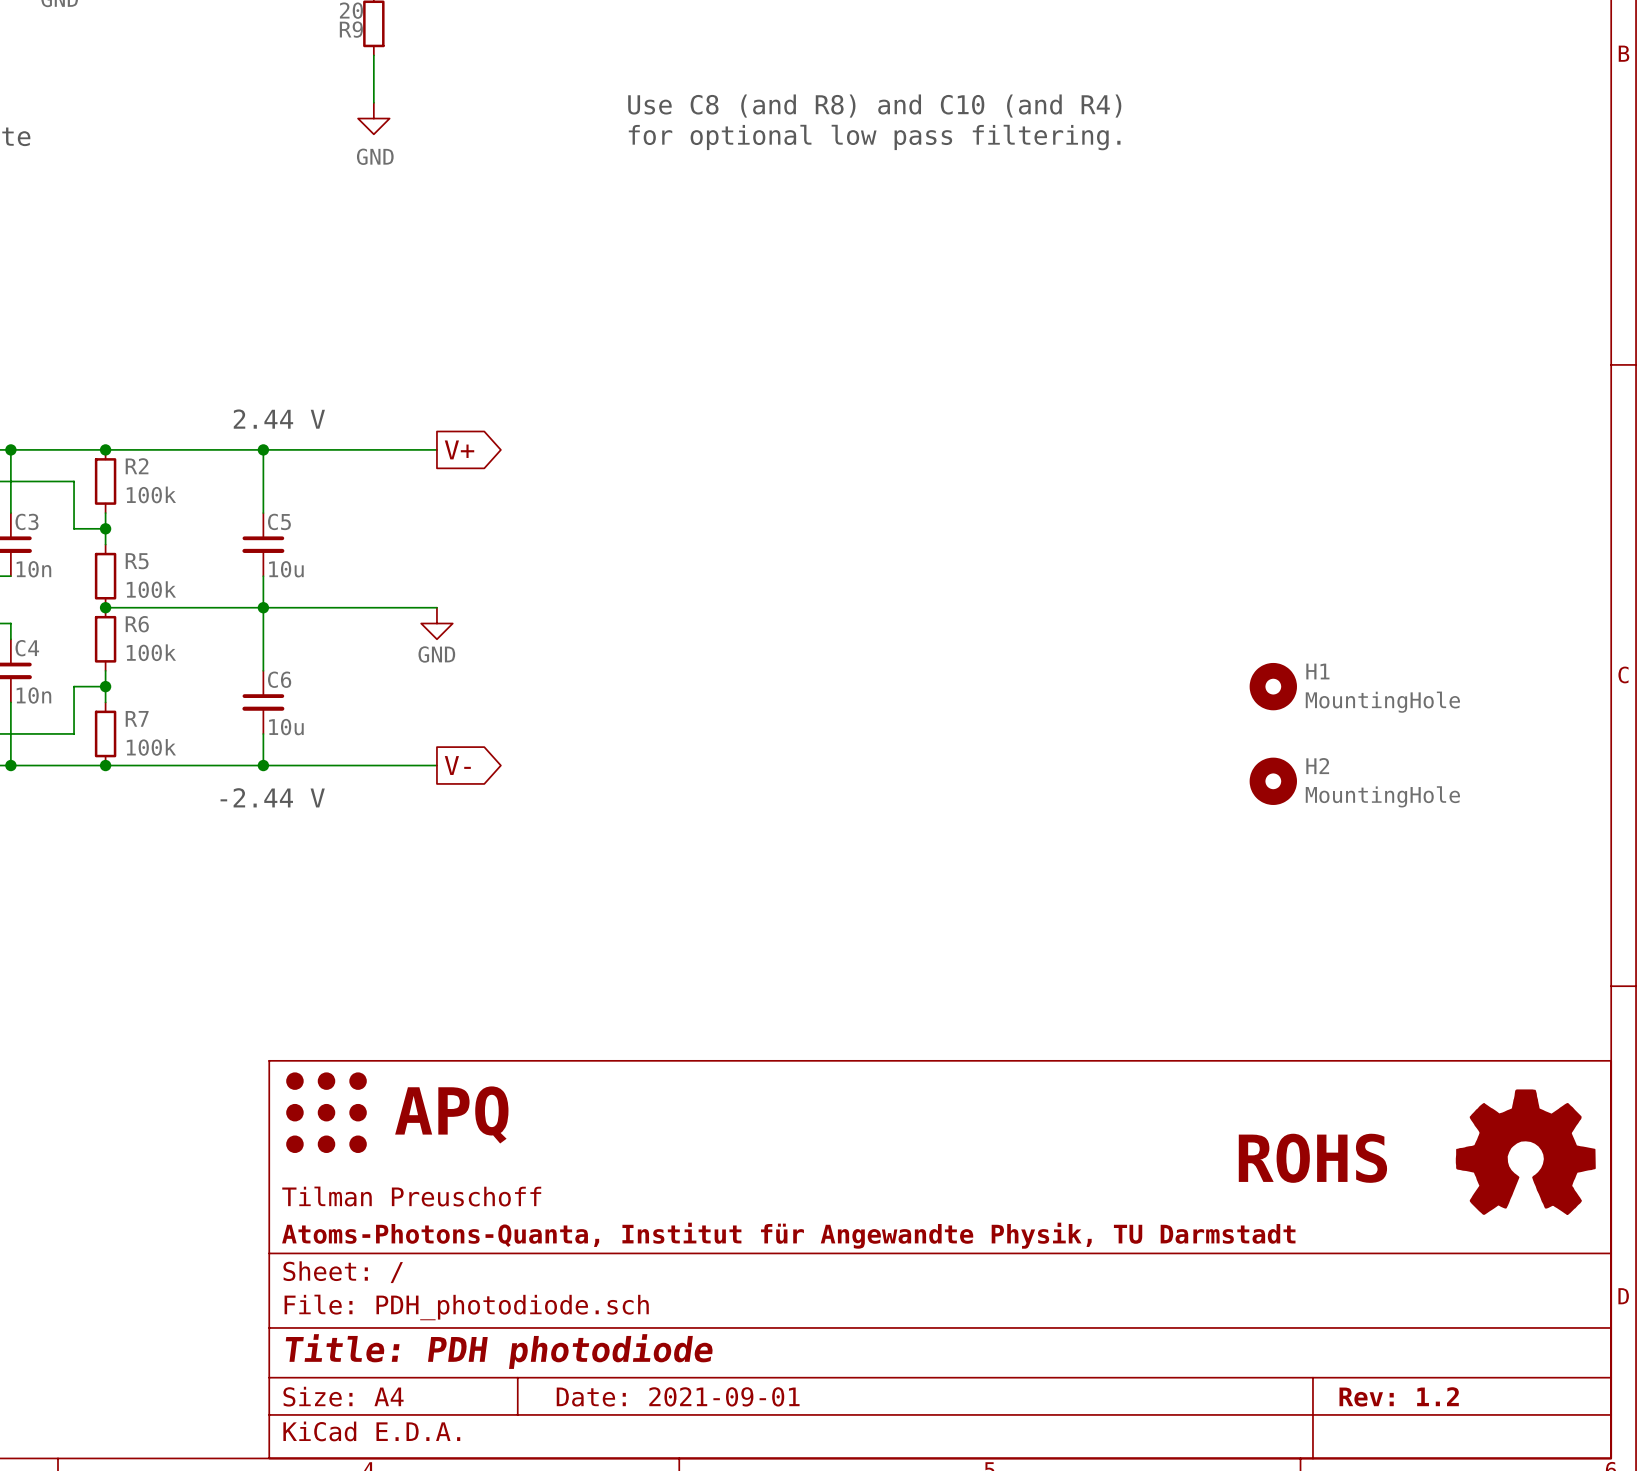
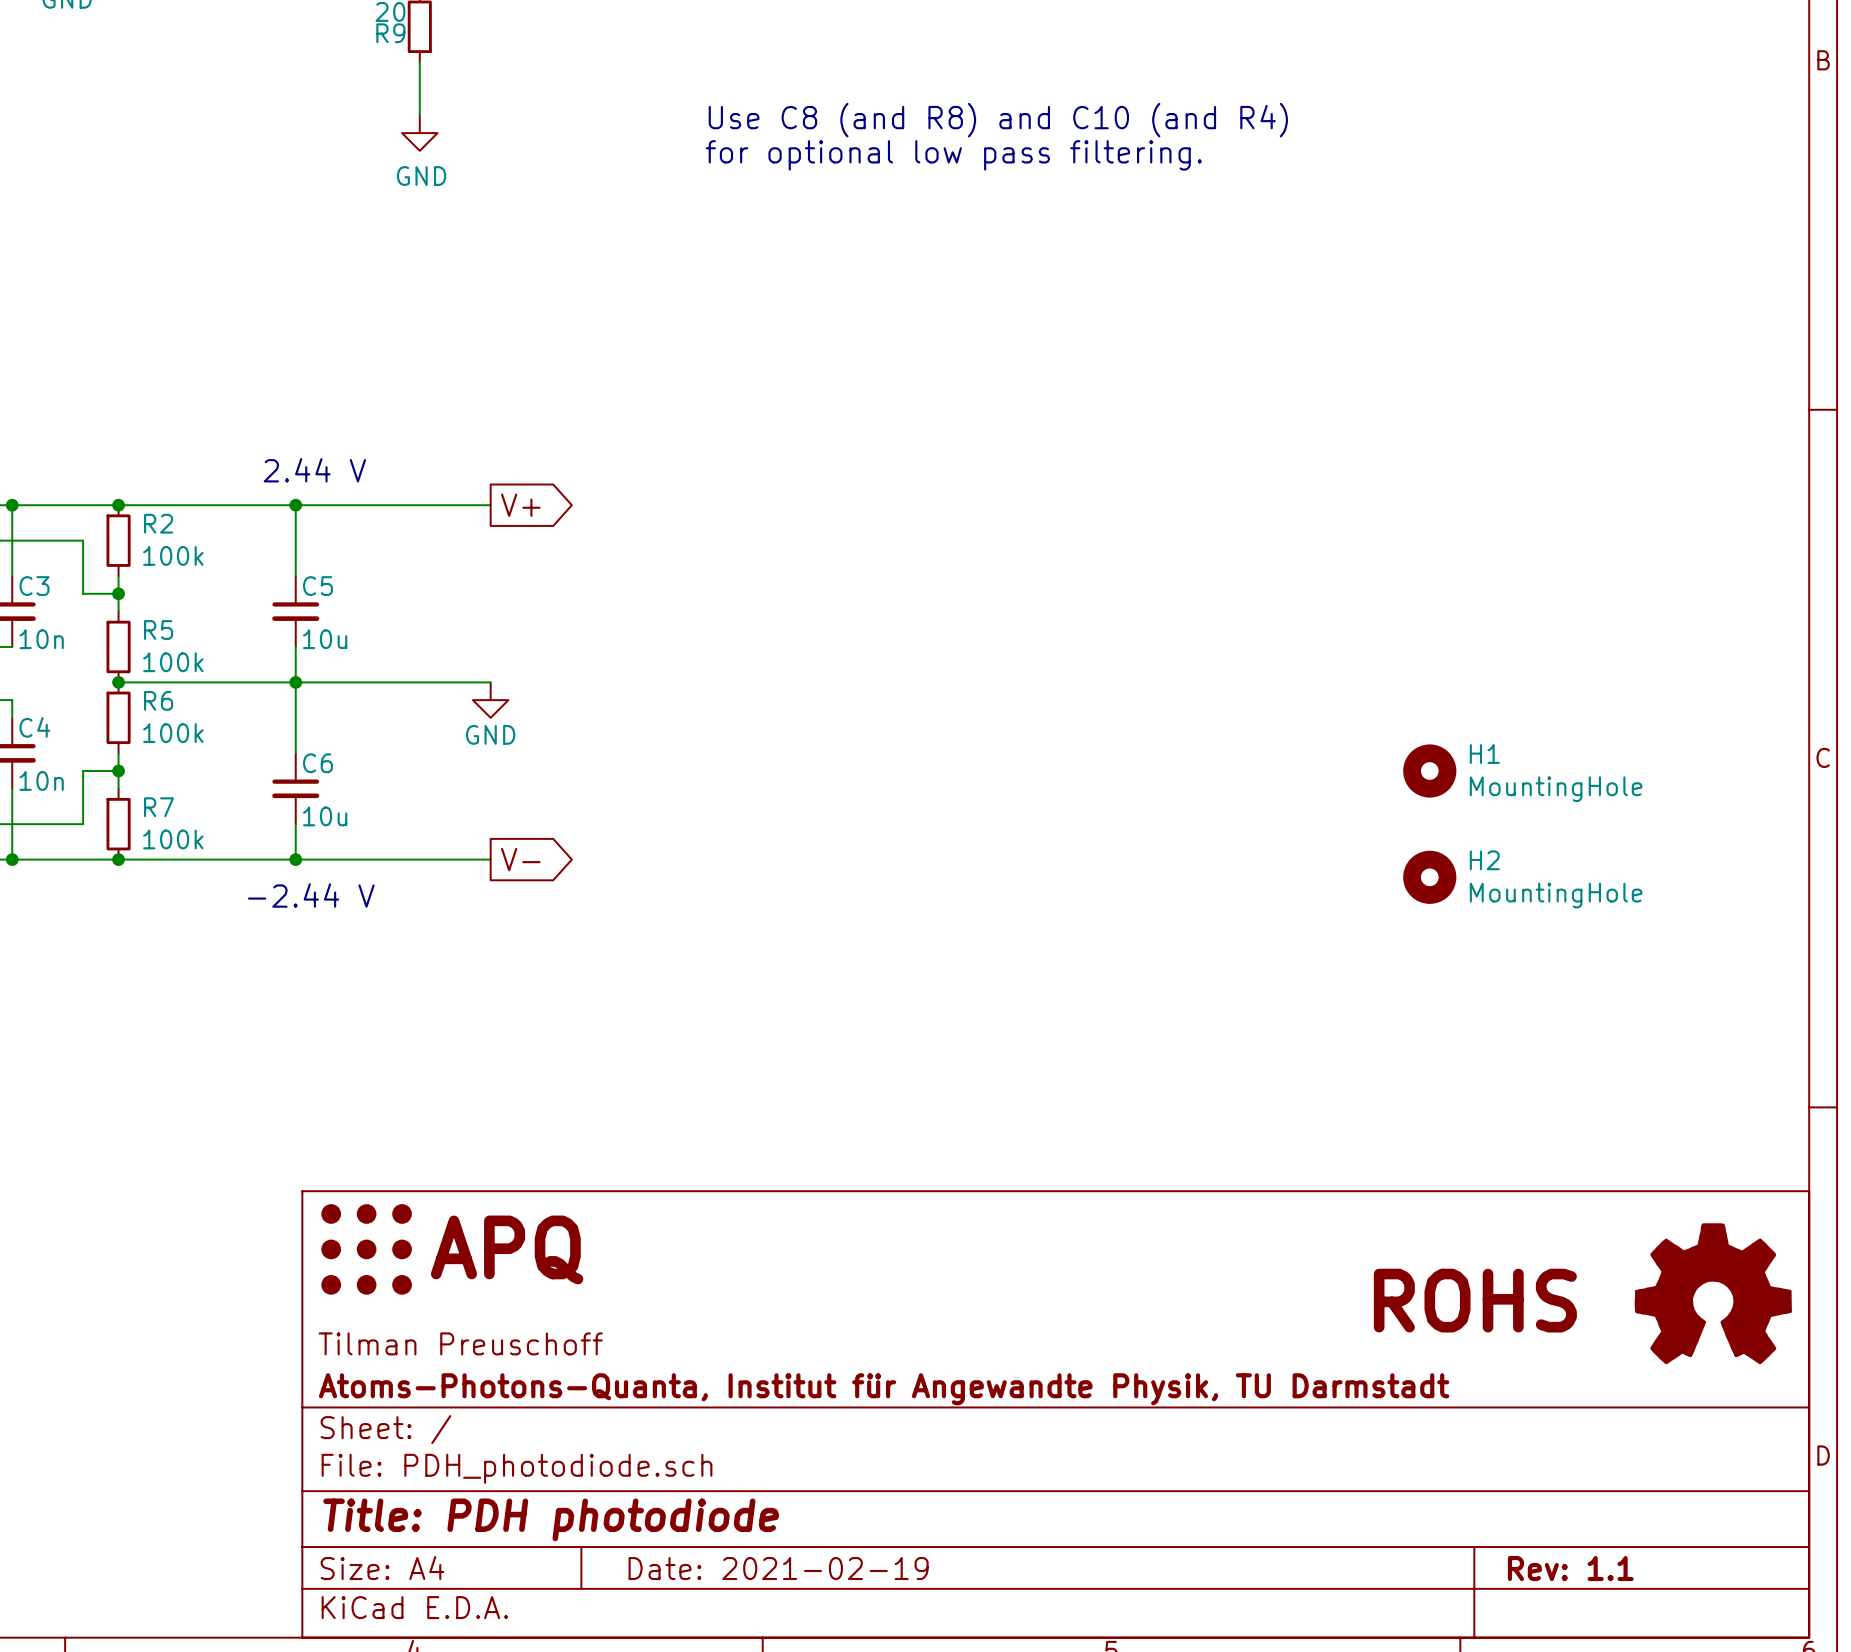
title block: Date: 2021-09-01 (678, 1396) -> Date: 2021-02-19 (778, 1568)
title block: Rev: 1.2 (1399, 1396) -> Rev: 1.1 (1570, 1568)

